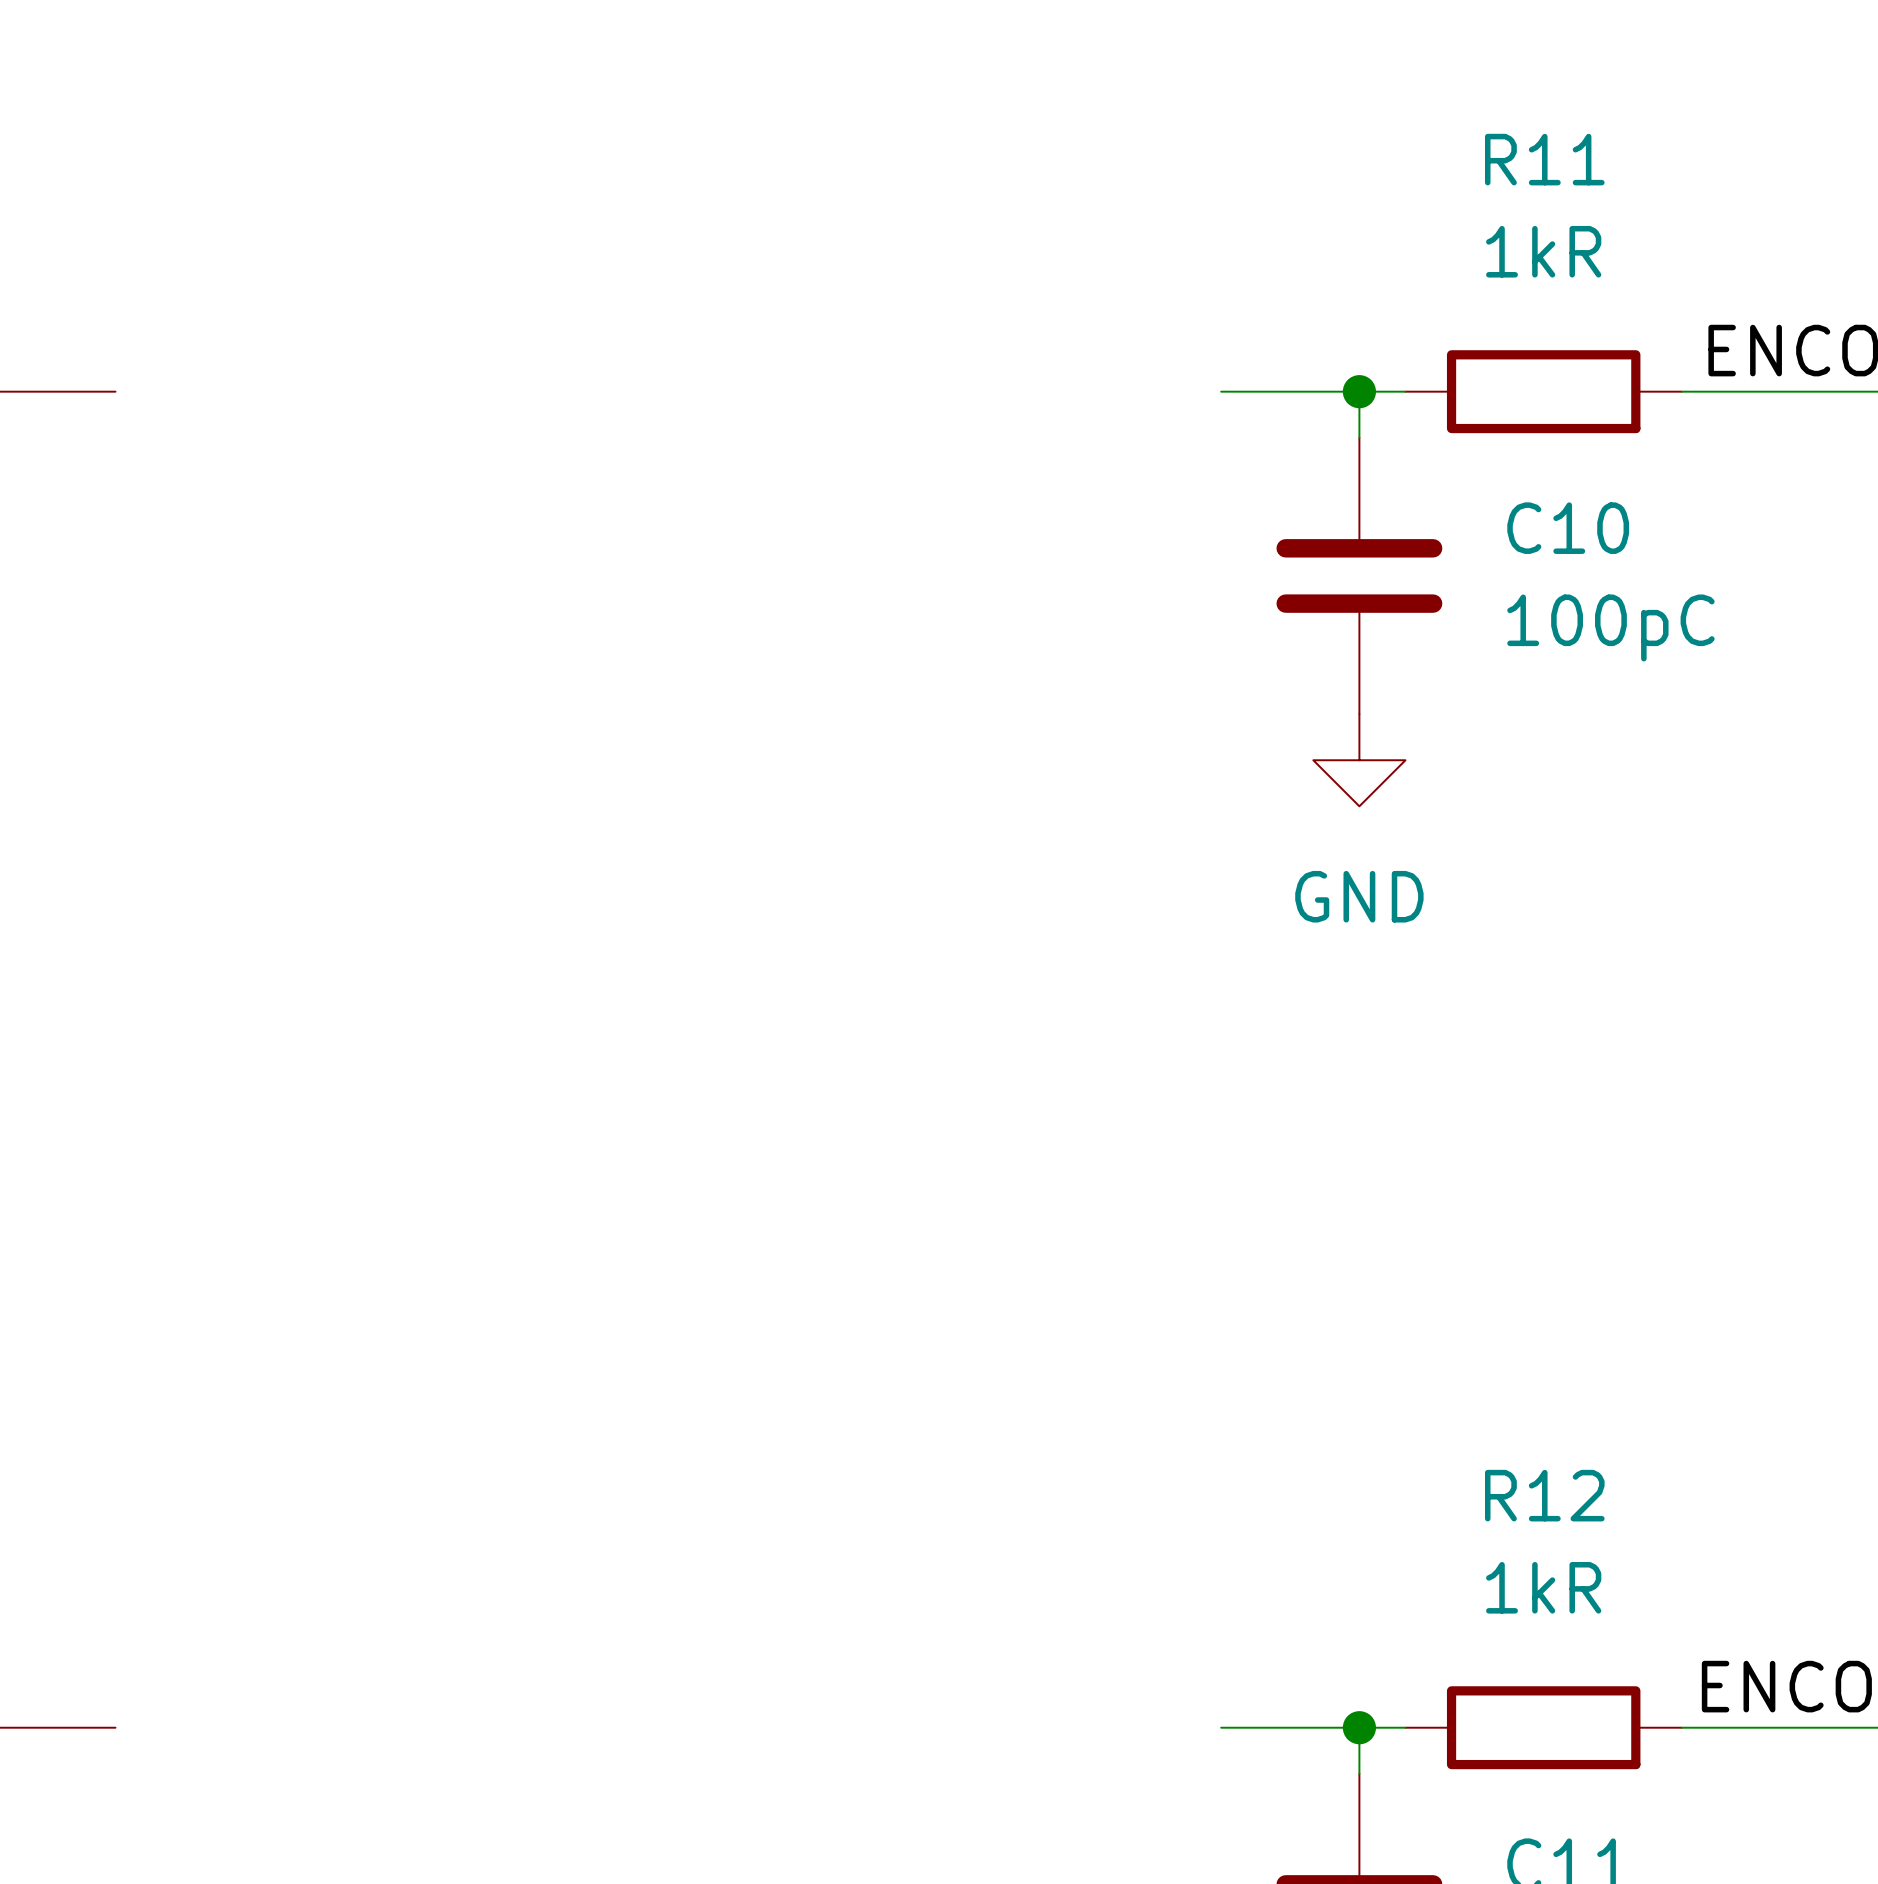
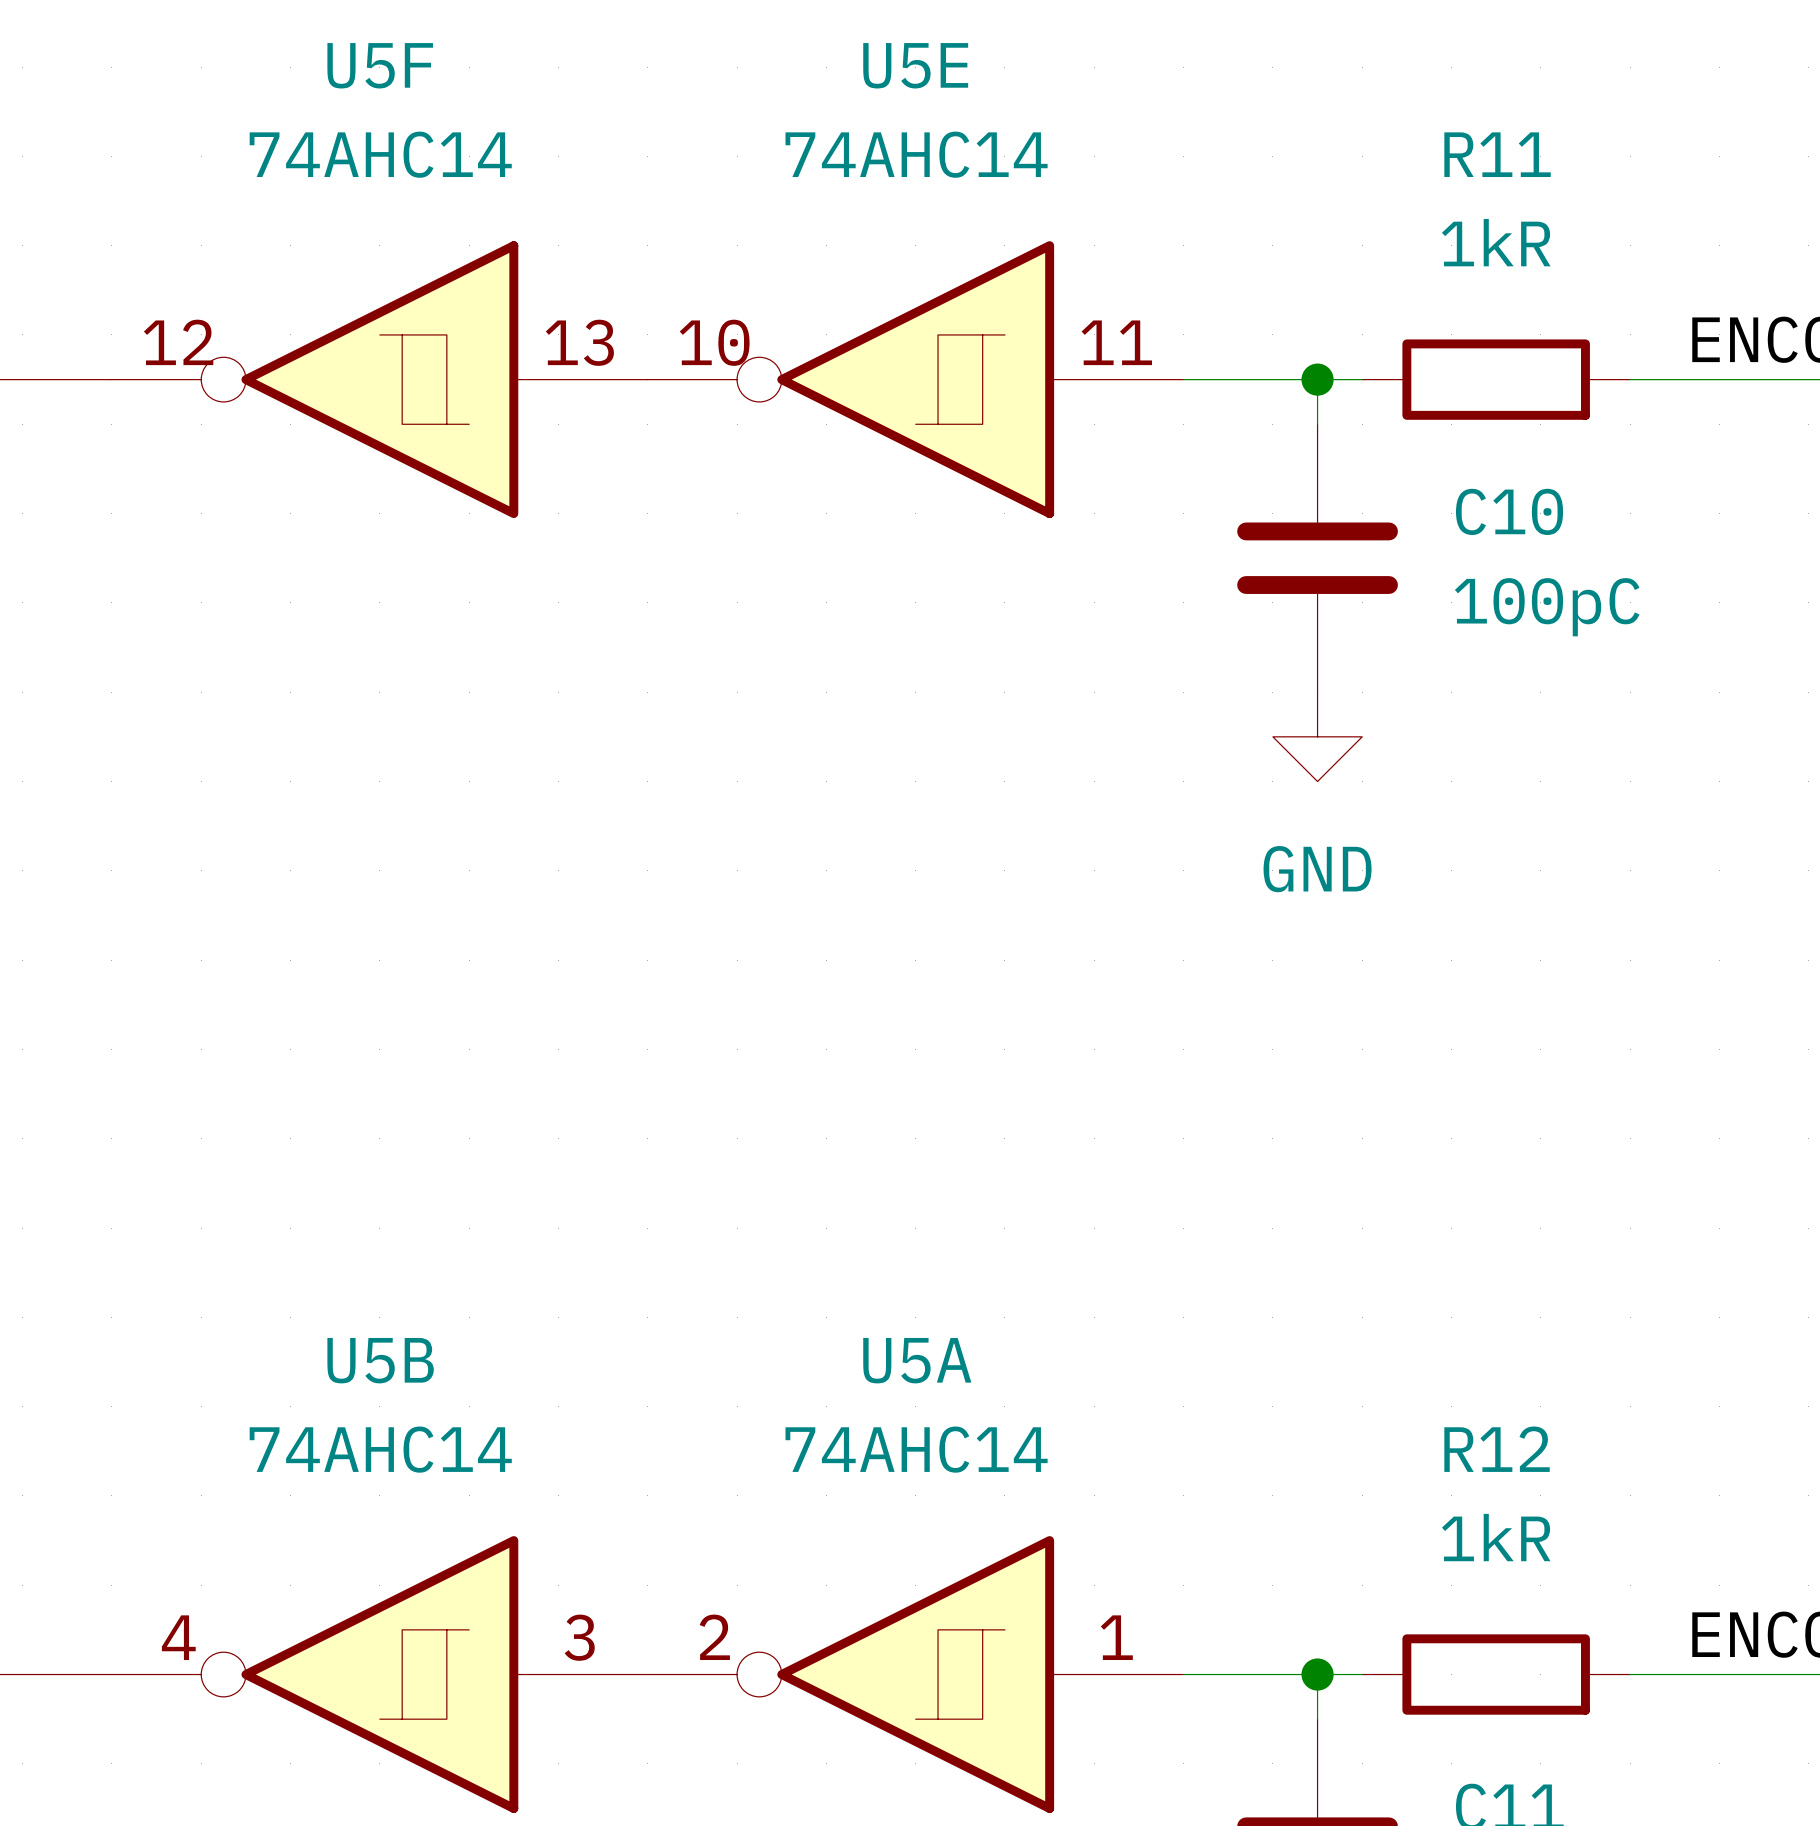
U5F: none -> 74AHC14 (379, 379)
U5E: none -> 74AHC14 (915, 379)
U5B: none -> 74AHC14 (379, 1674)
U5A: none -> 74AHC14 (915, 1674)

